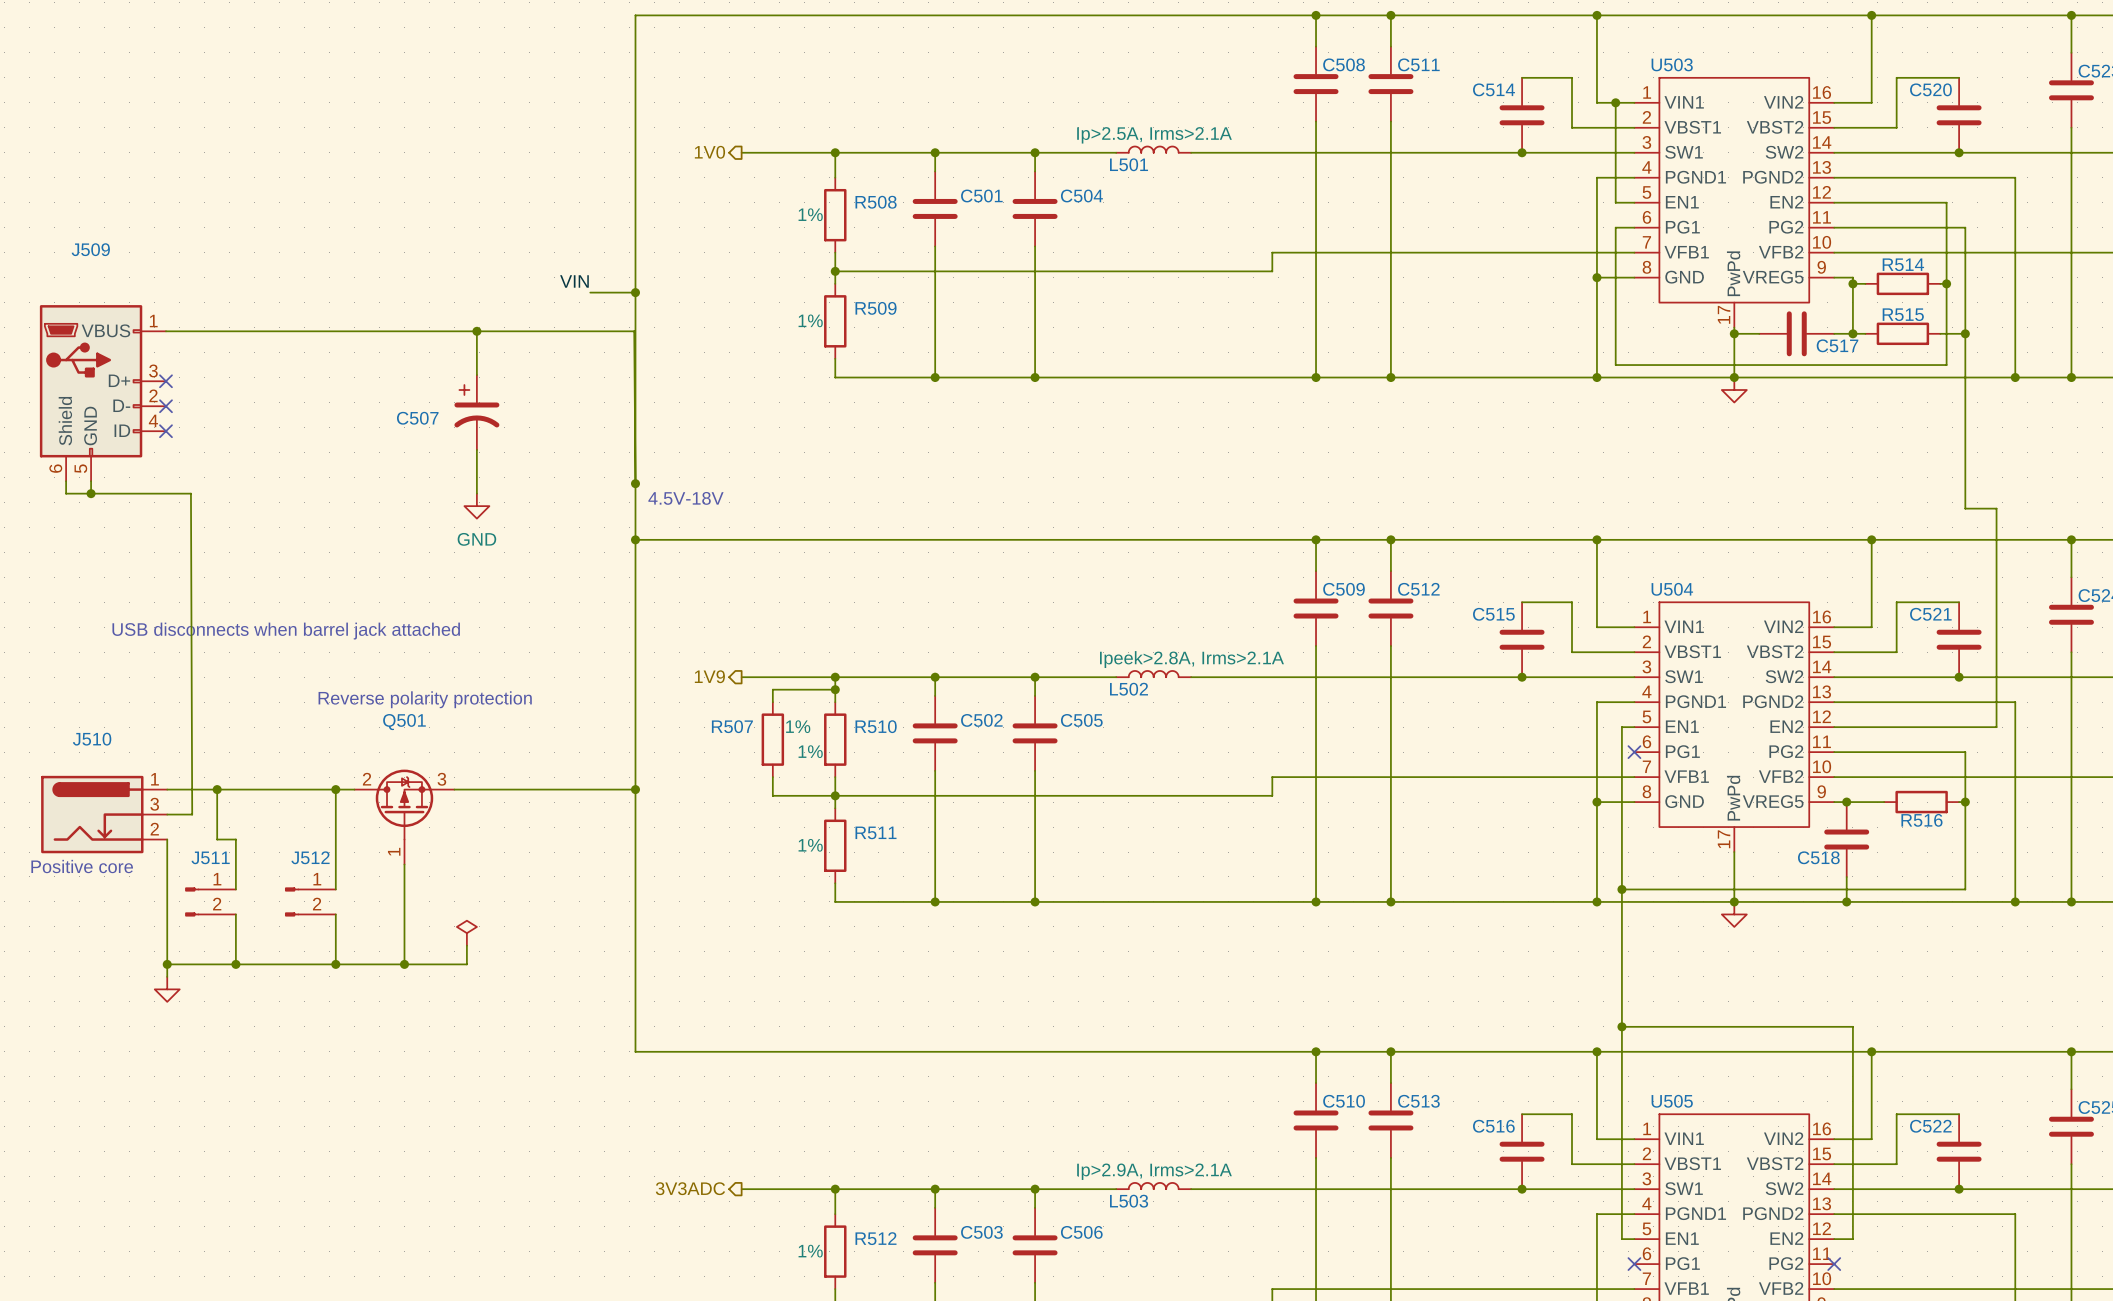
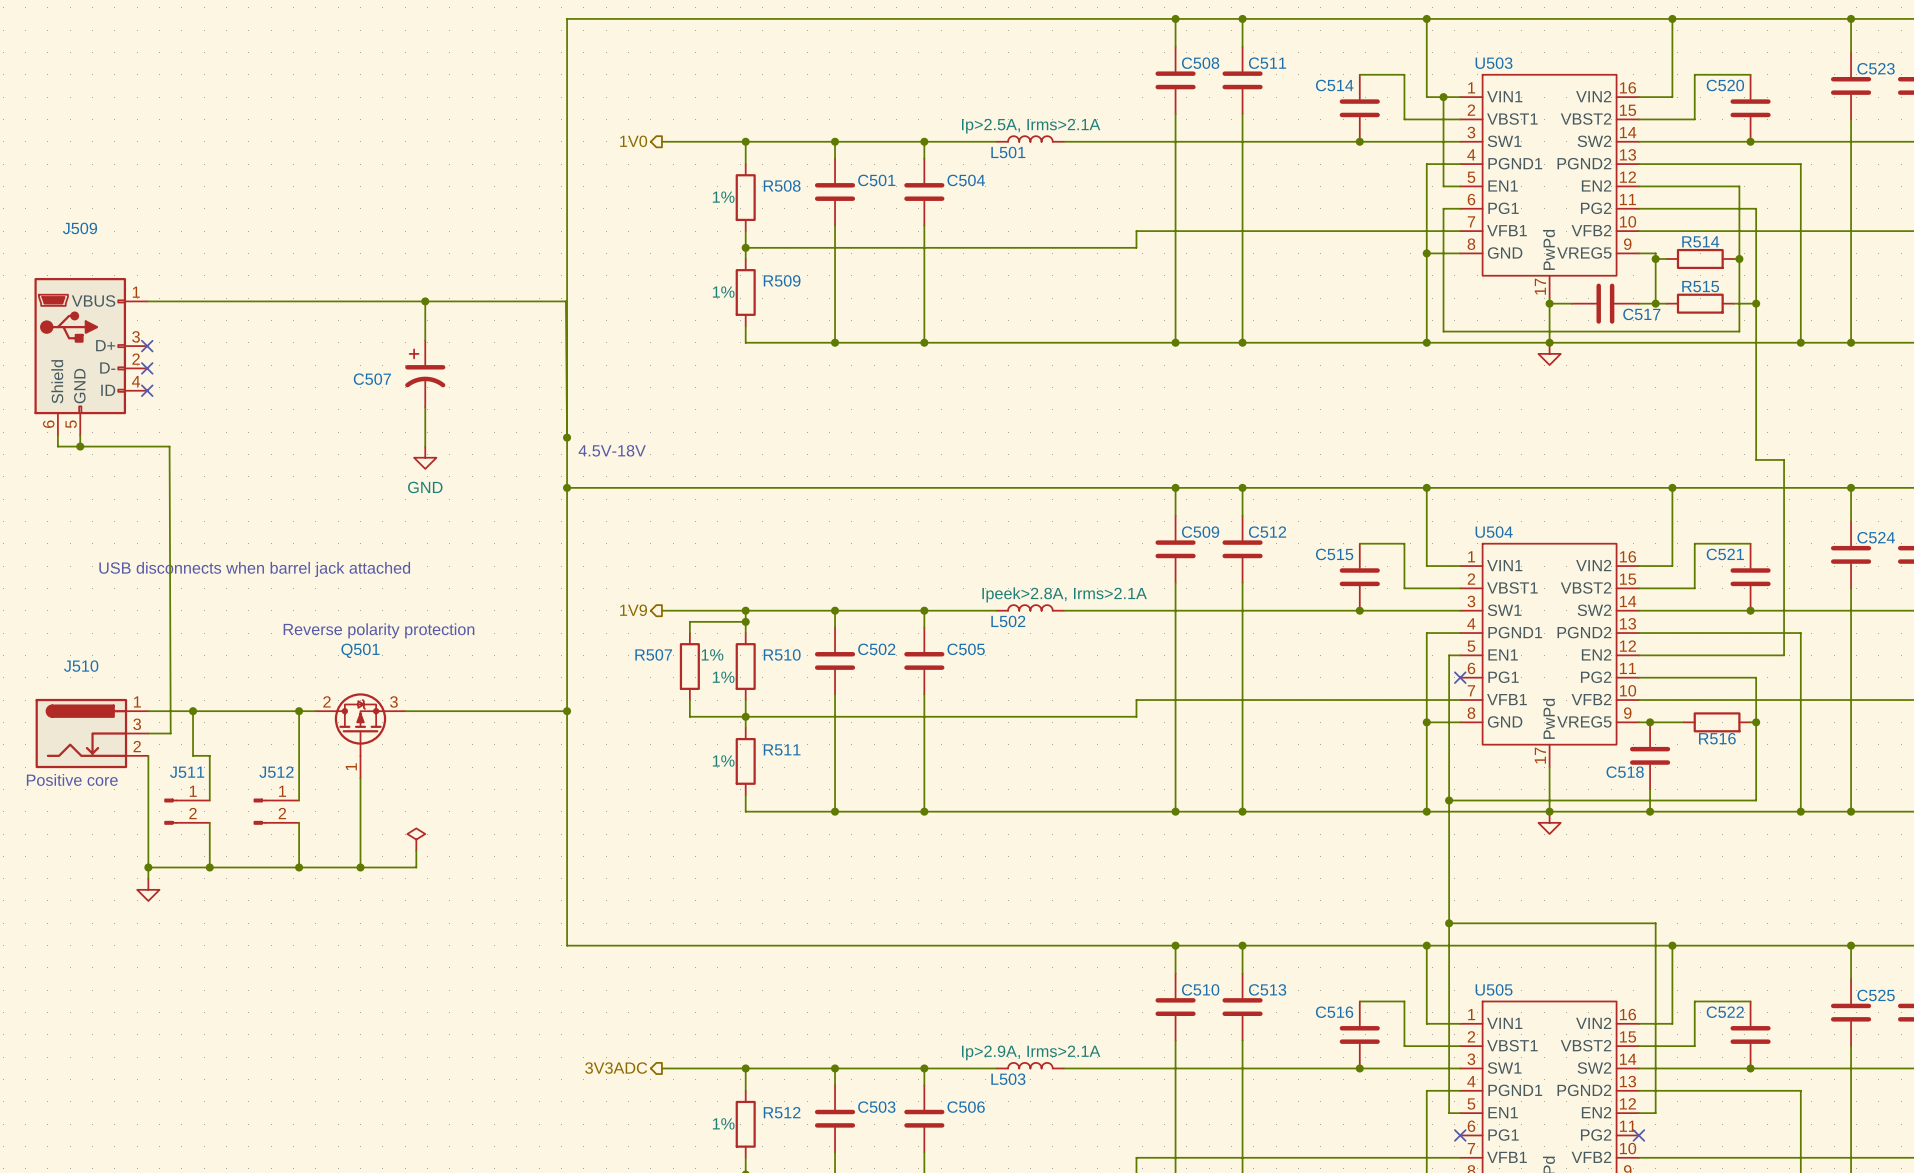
label: VIN (574, 281) -> none
wire: (590, 292) (635, 292) -> none
junction: (635, 292) -> none

